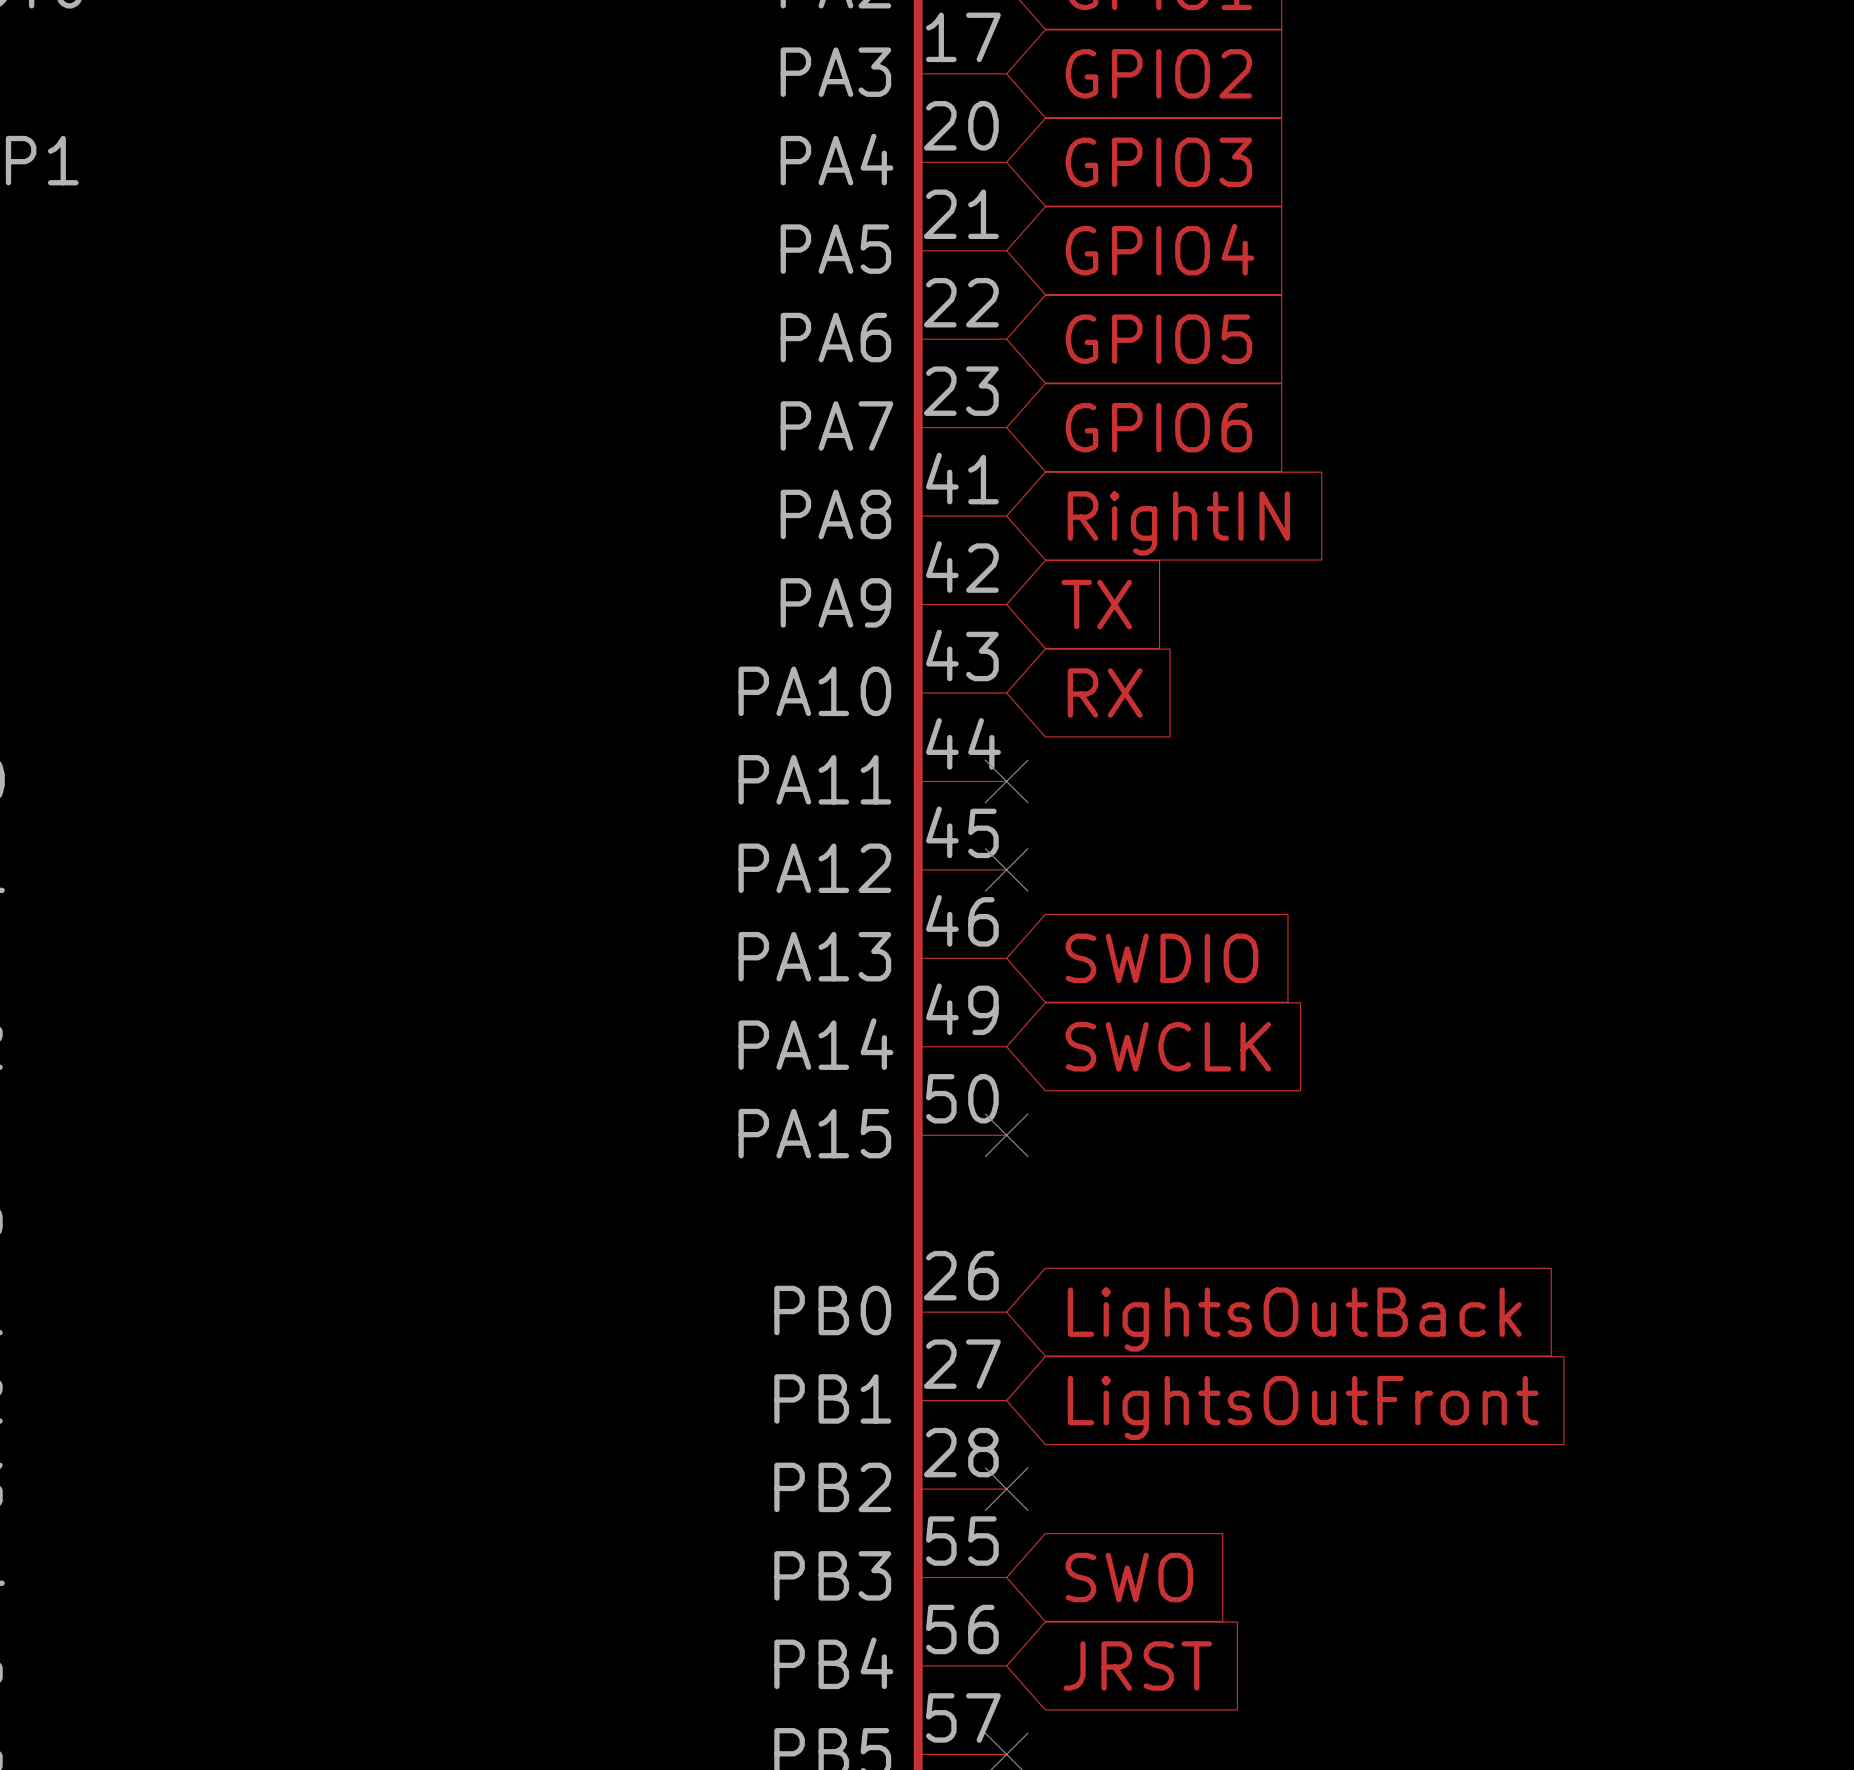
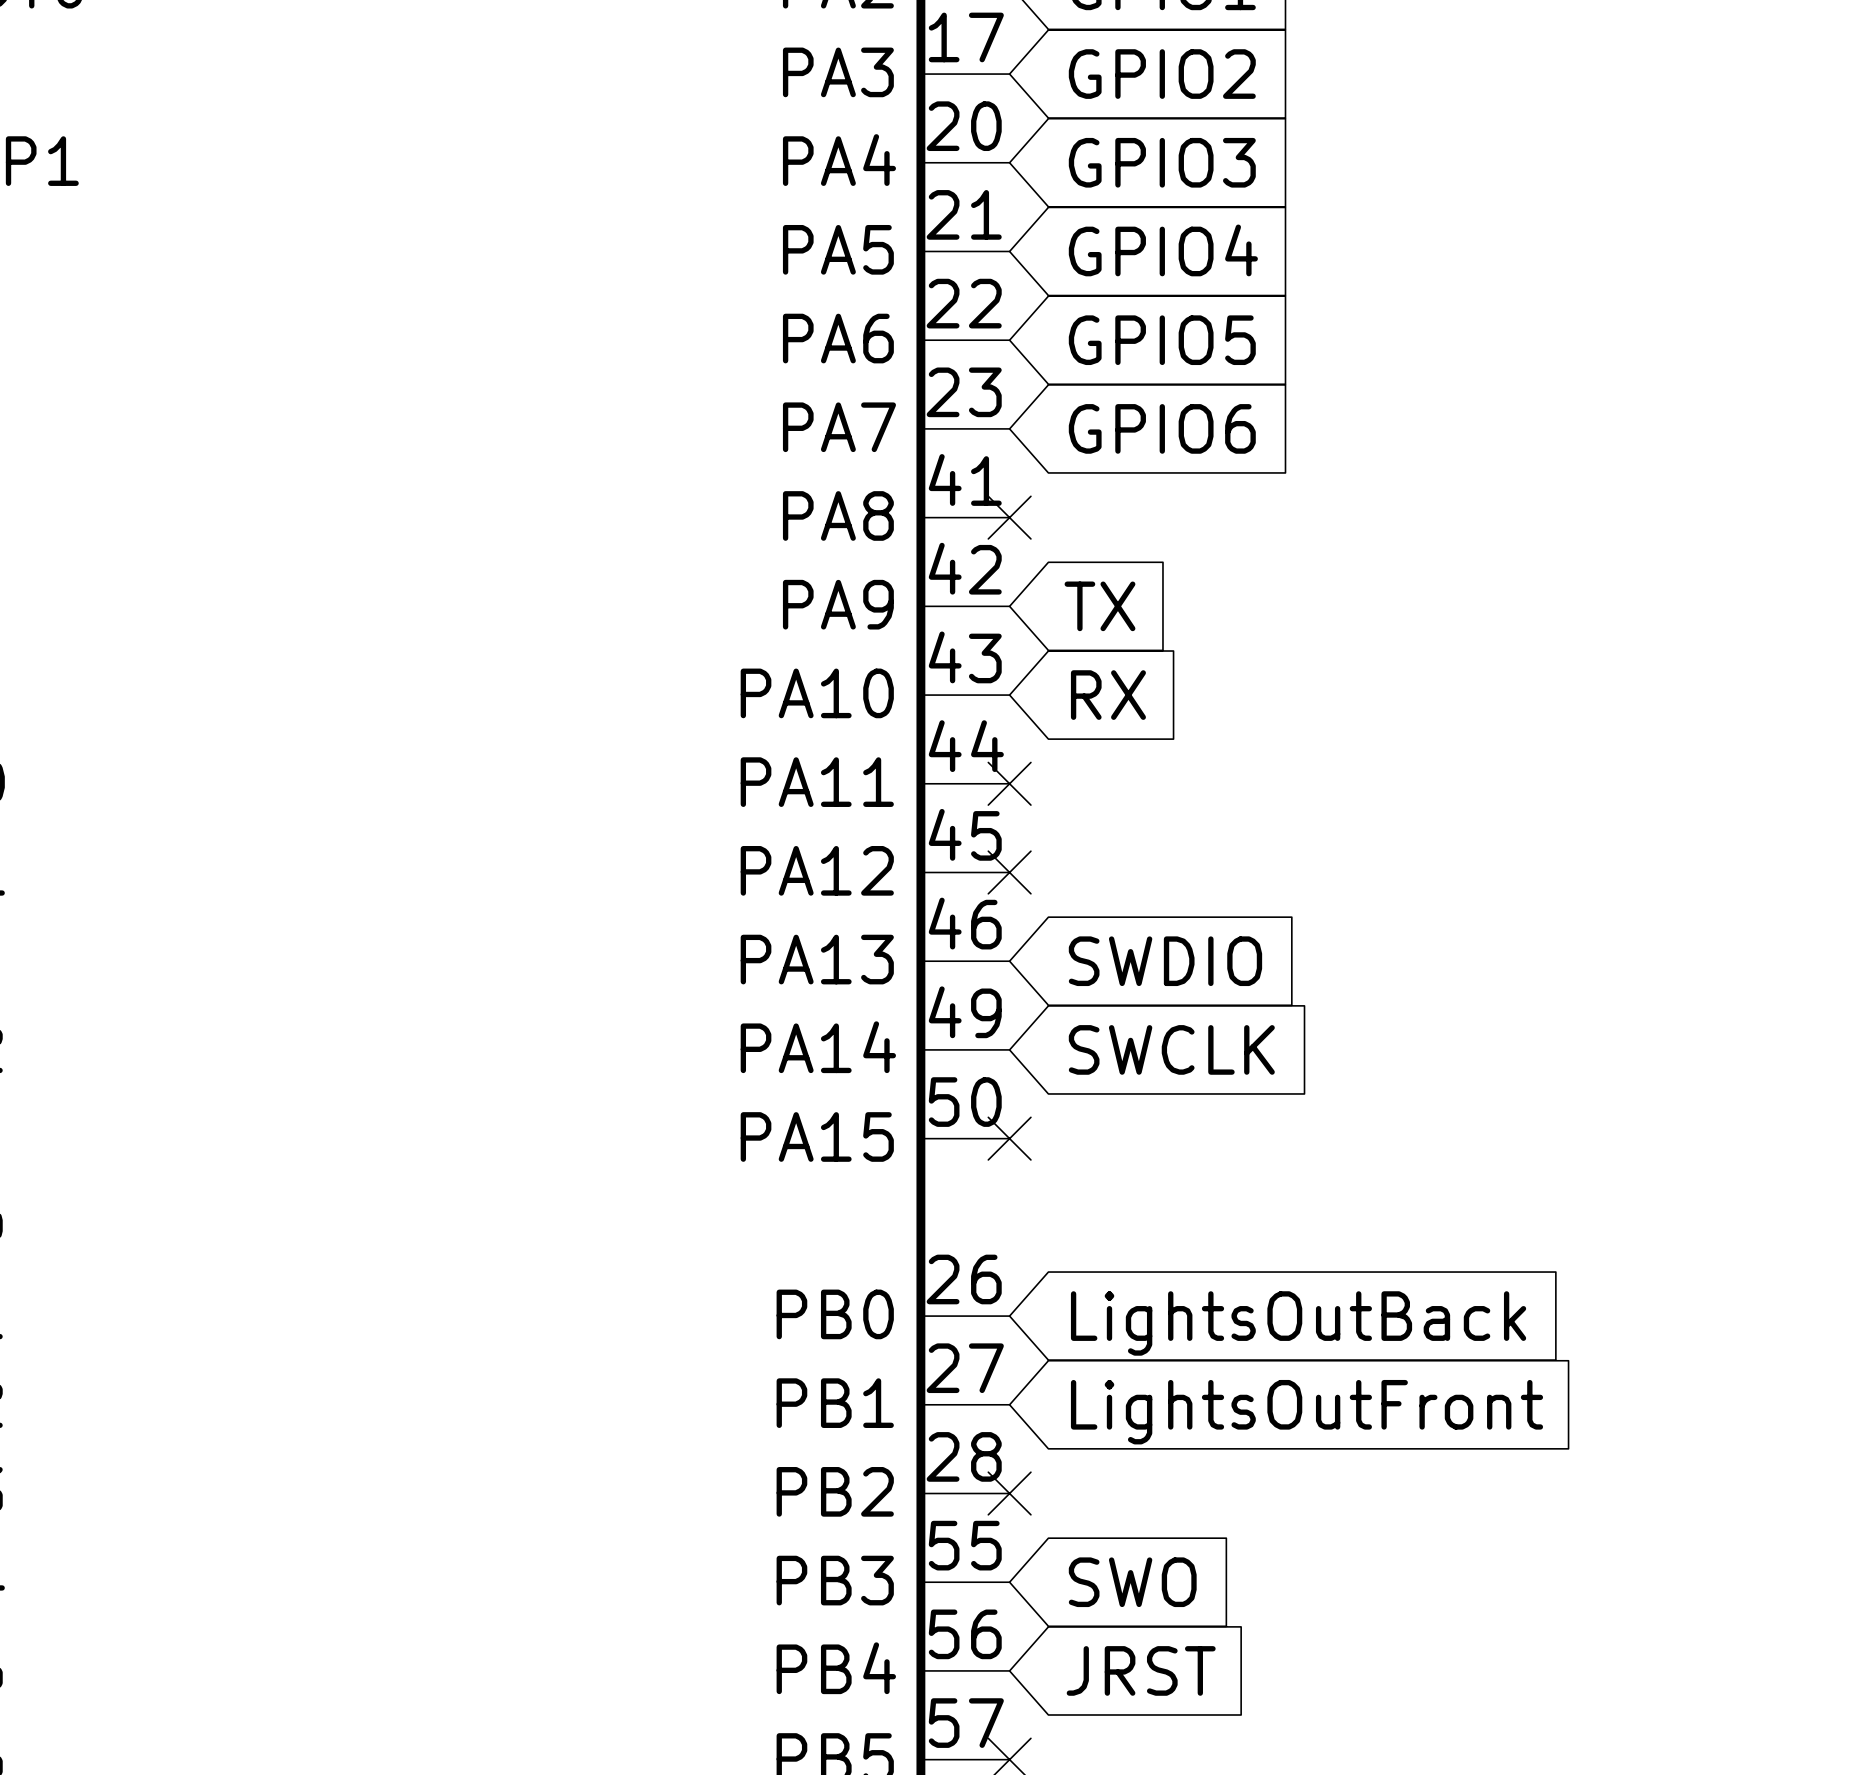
no-connect mark: none -> (1009, 517)
global label: RightIN (1178, 523) -> none

